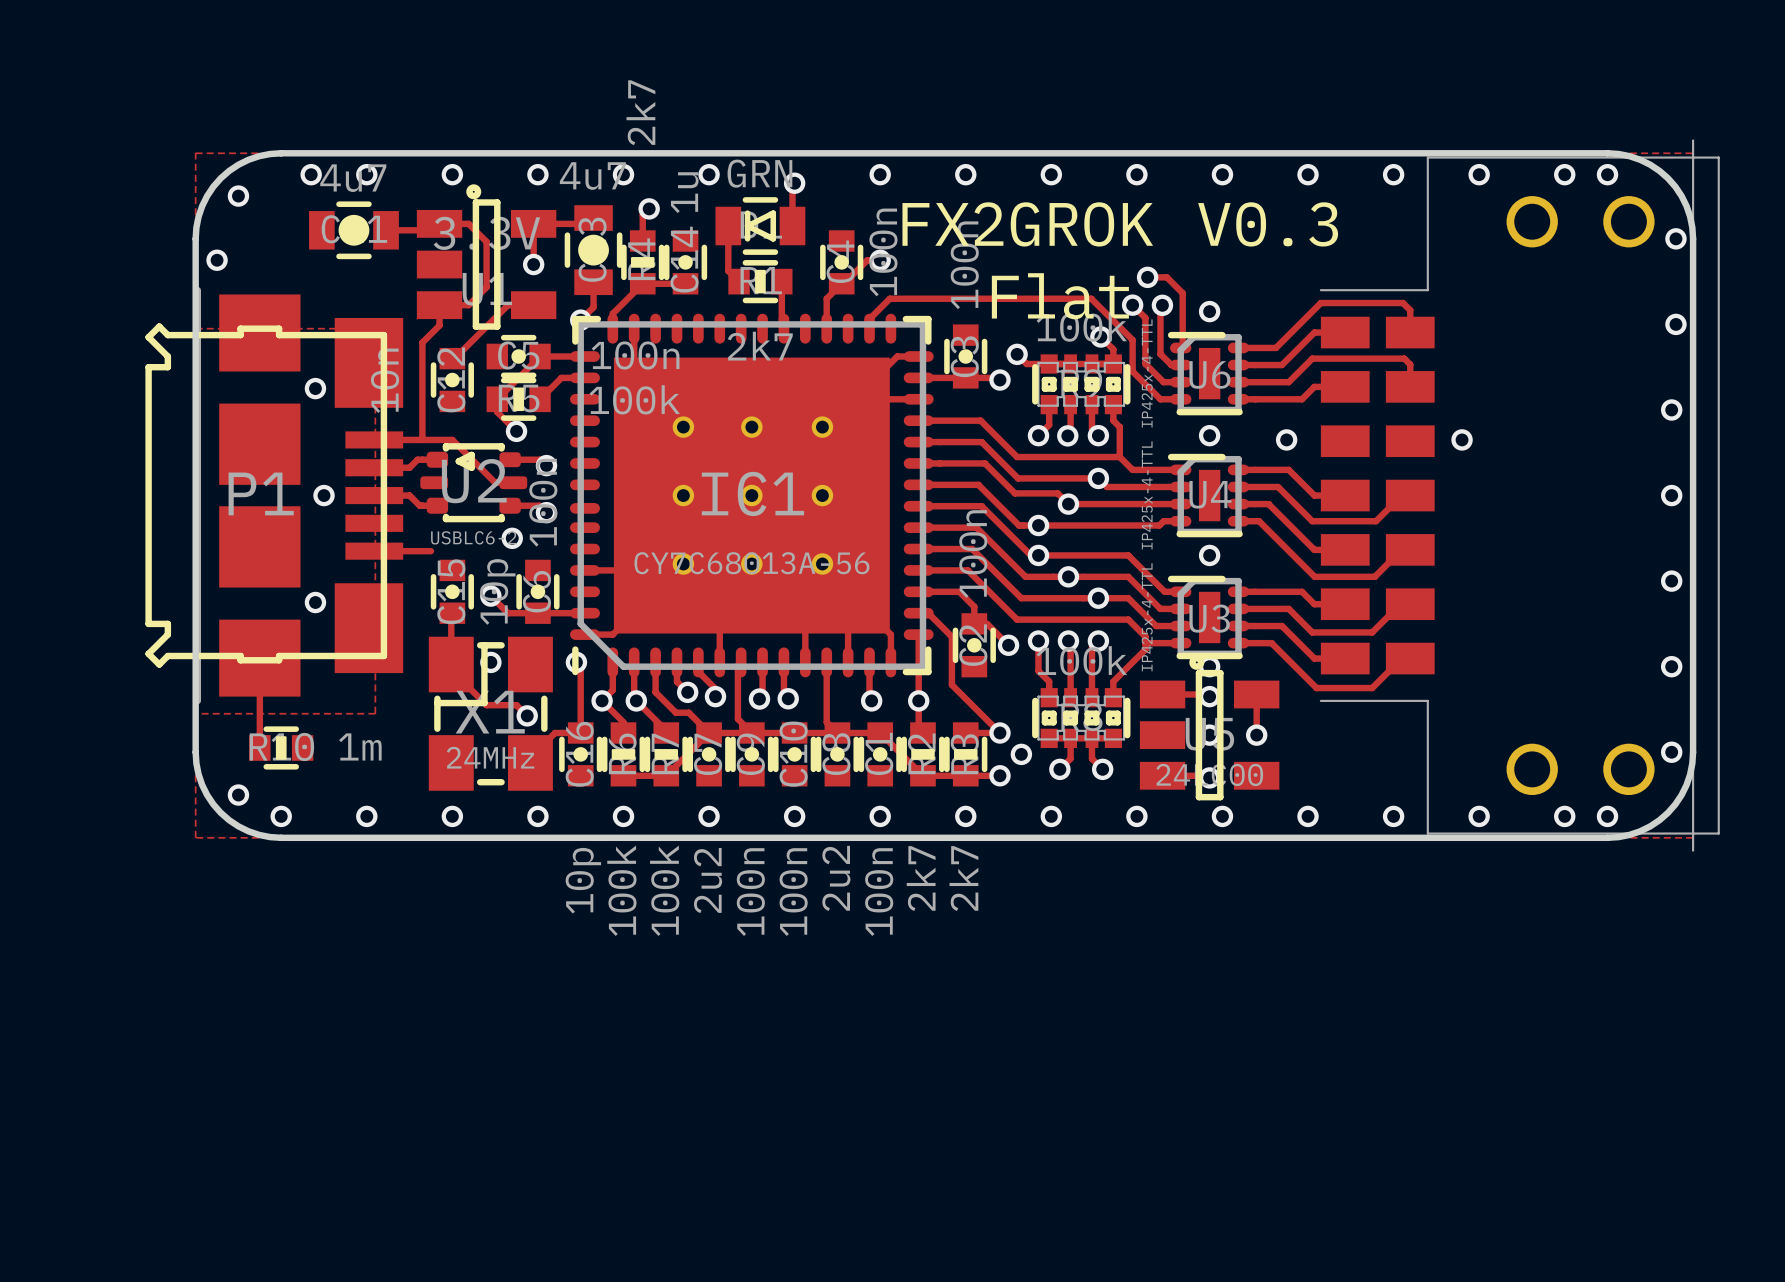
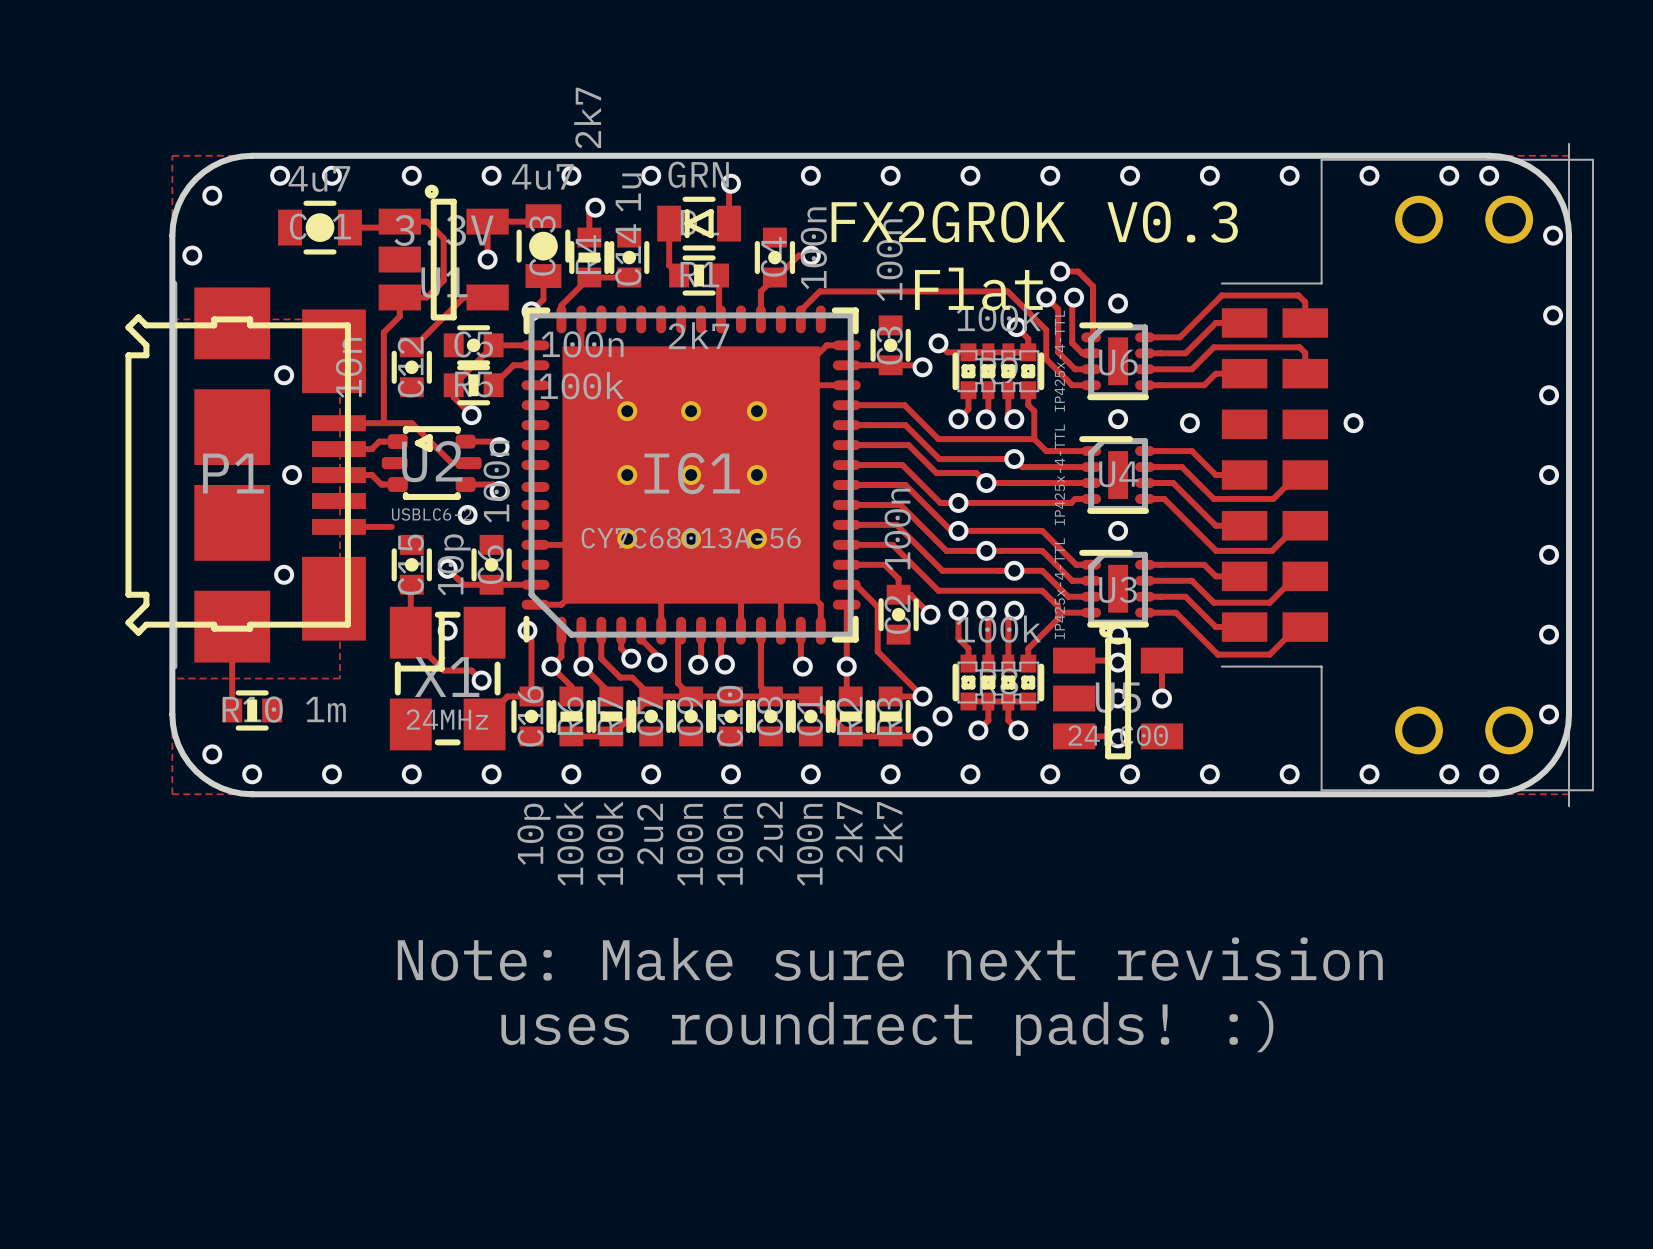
text: none -> Note: Make sure next revision (890, 959)
text: none -> uses roundrect pads! :) (887, 1028)

